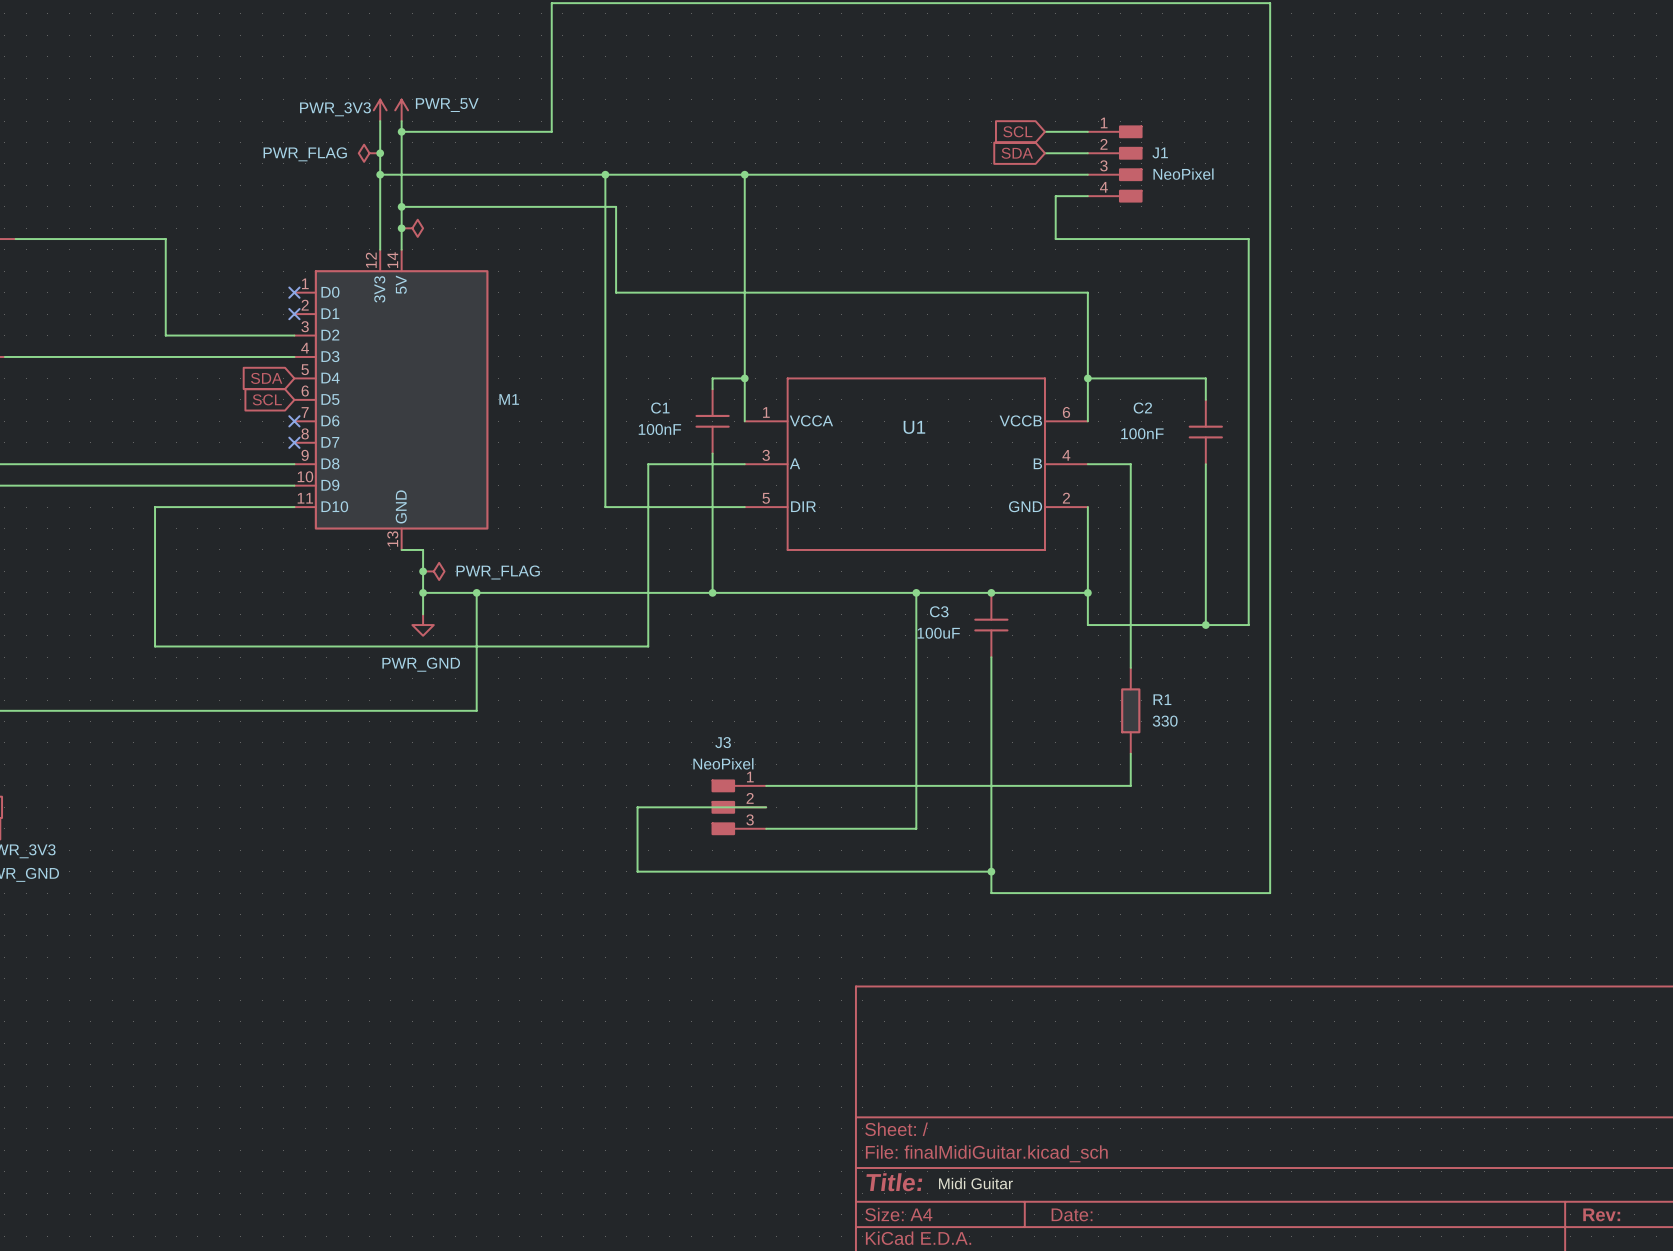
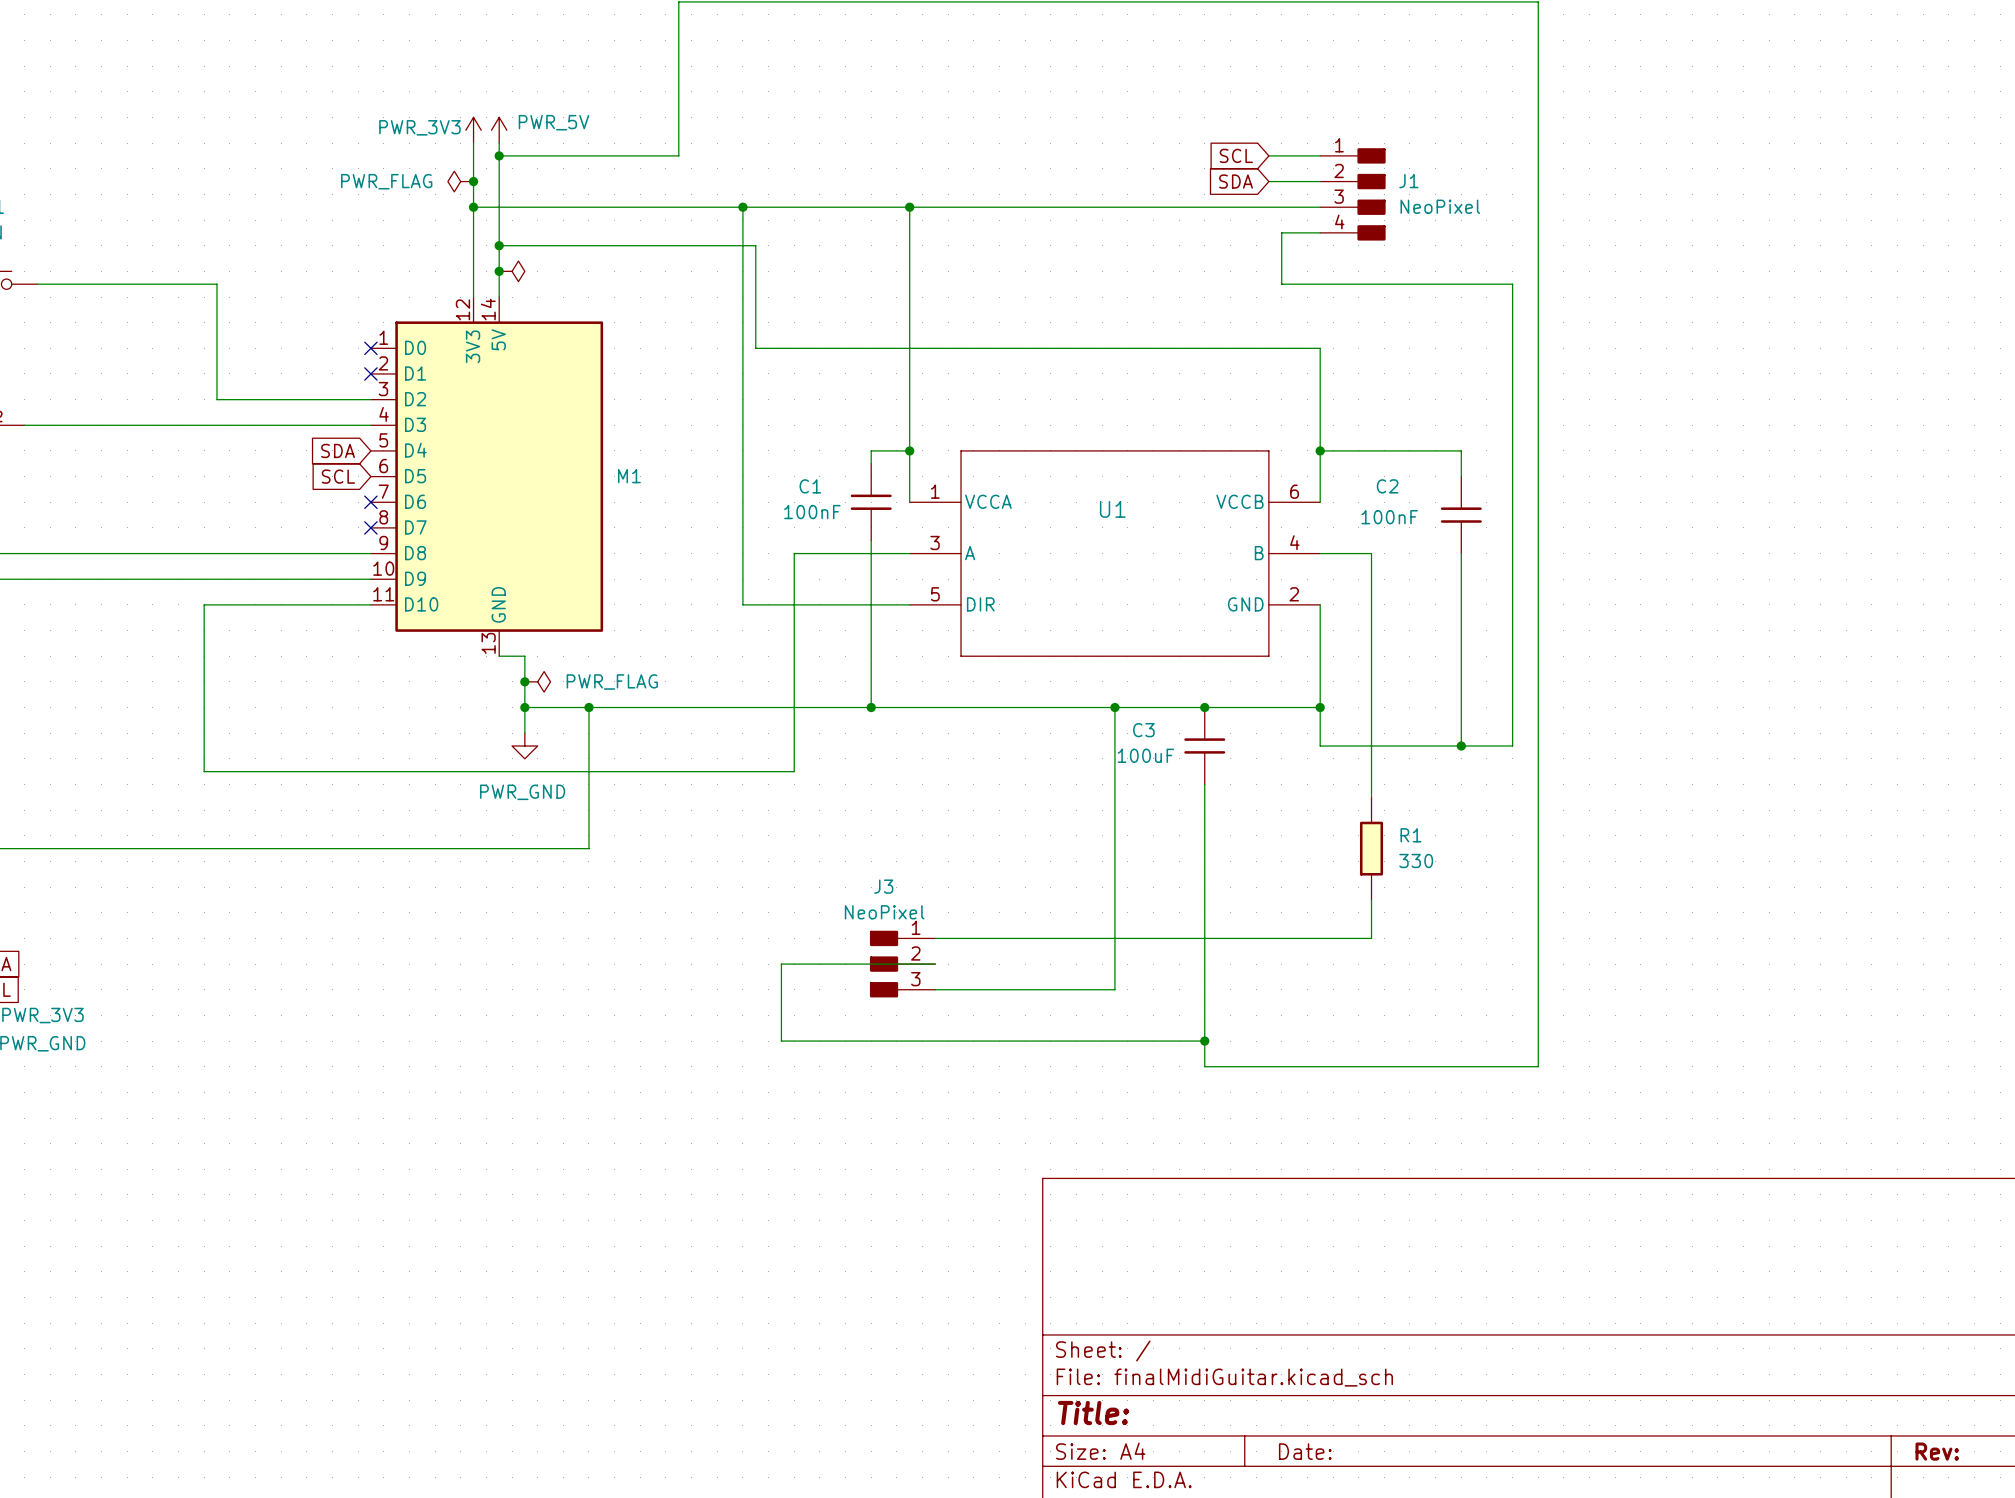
label: Midi Guitar (975, 1183) -> none

